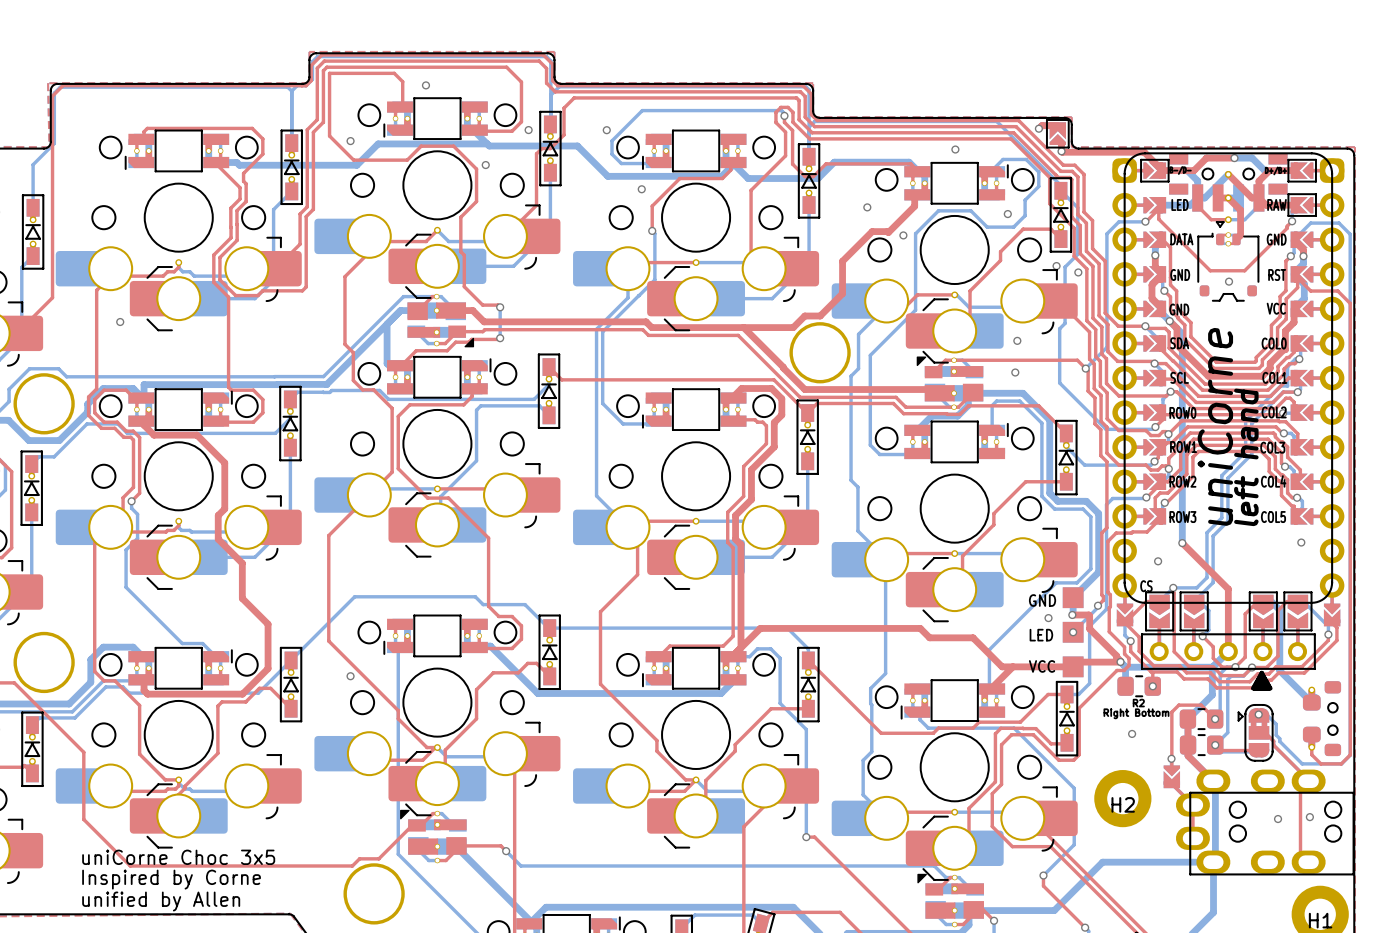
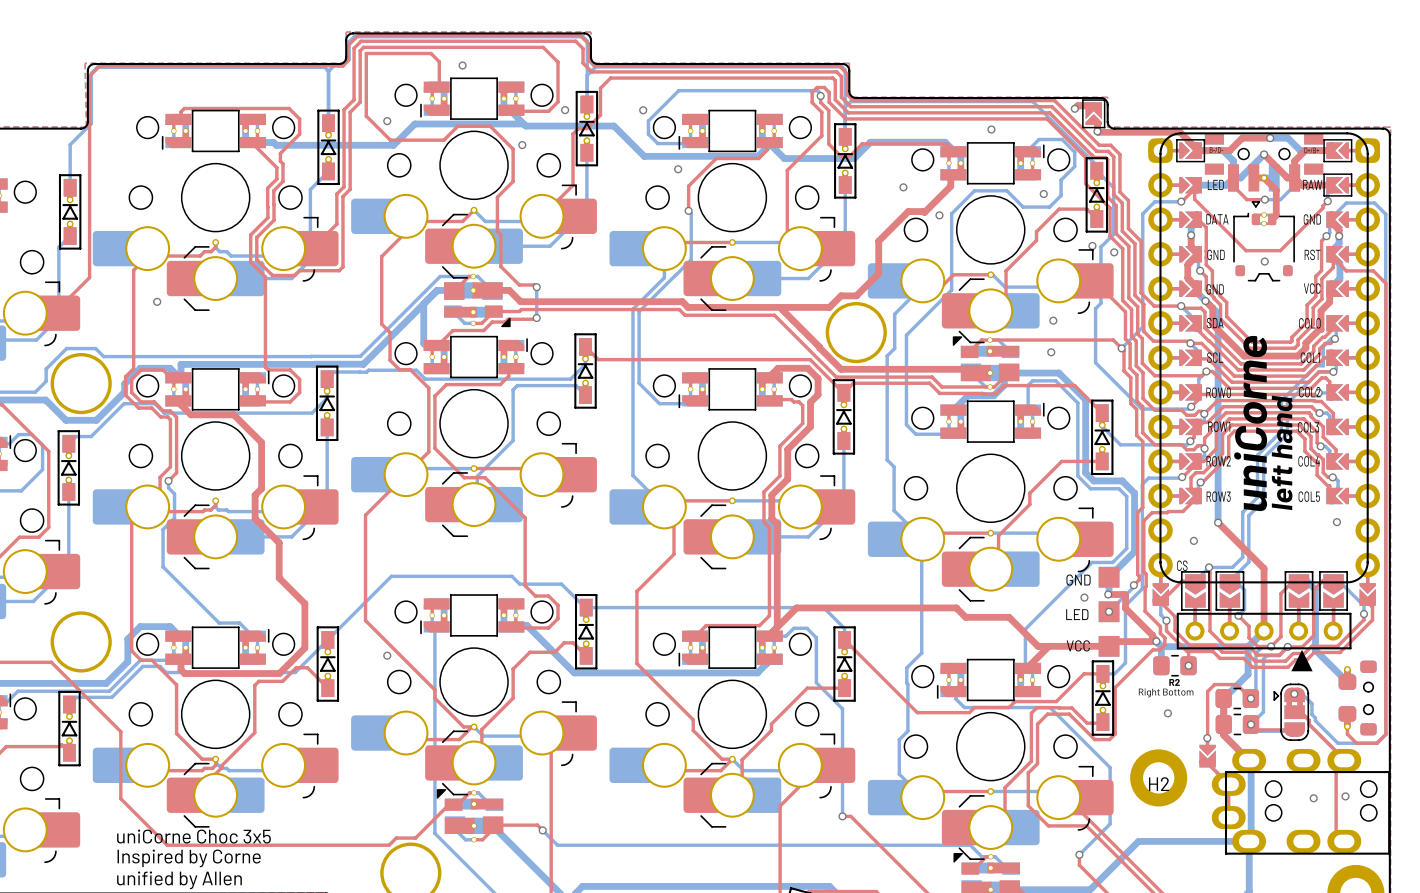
part footprint: [1169, 153, 1288, 224] -> [1204, 133, 1324, 192]
via: none -> (1264, 154)
via: none -> (1264, 199)

